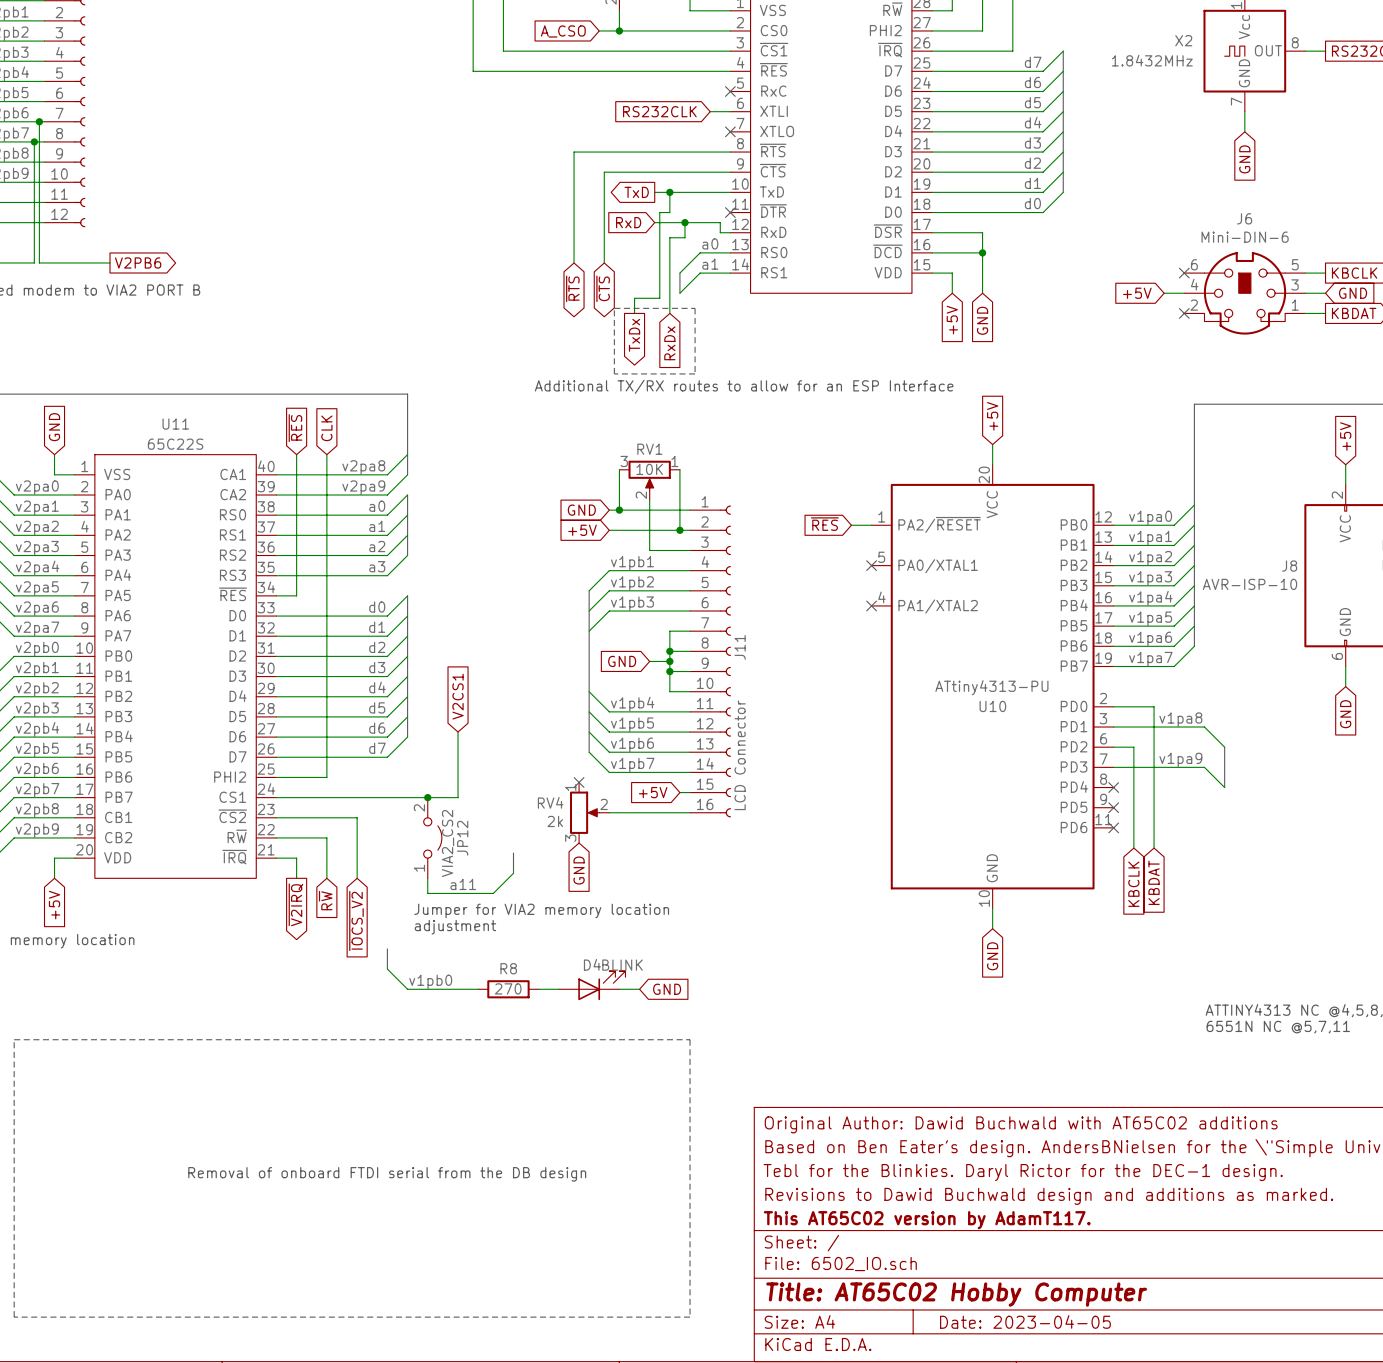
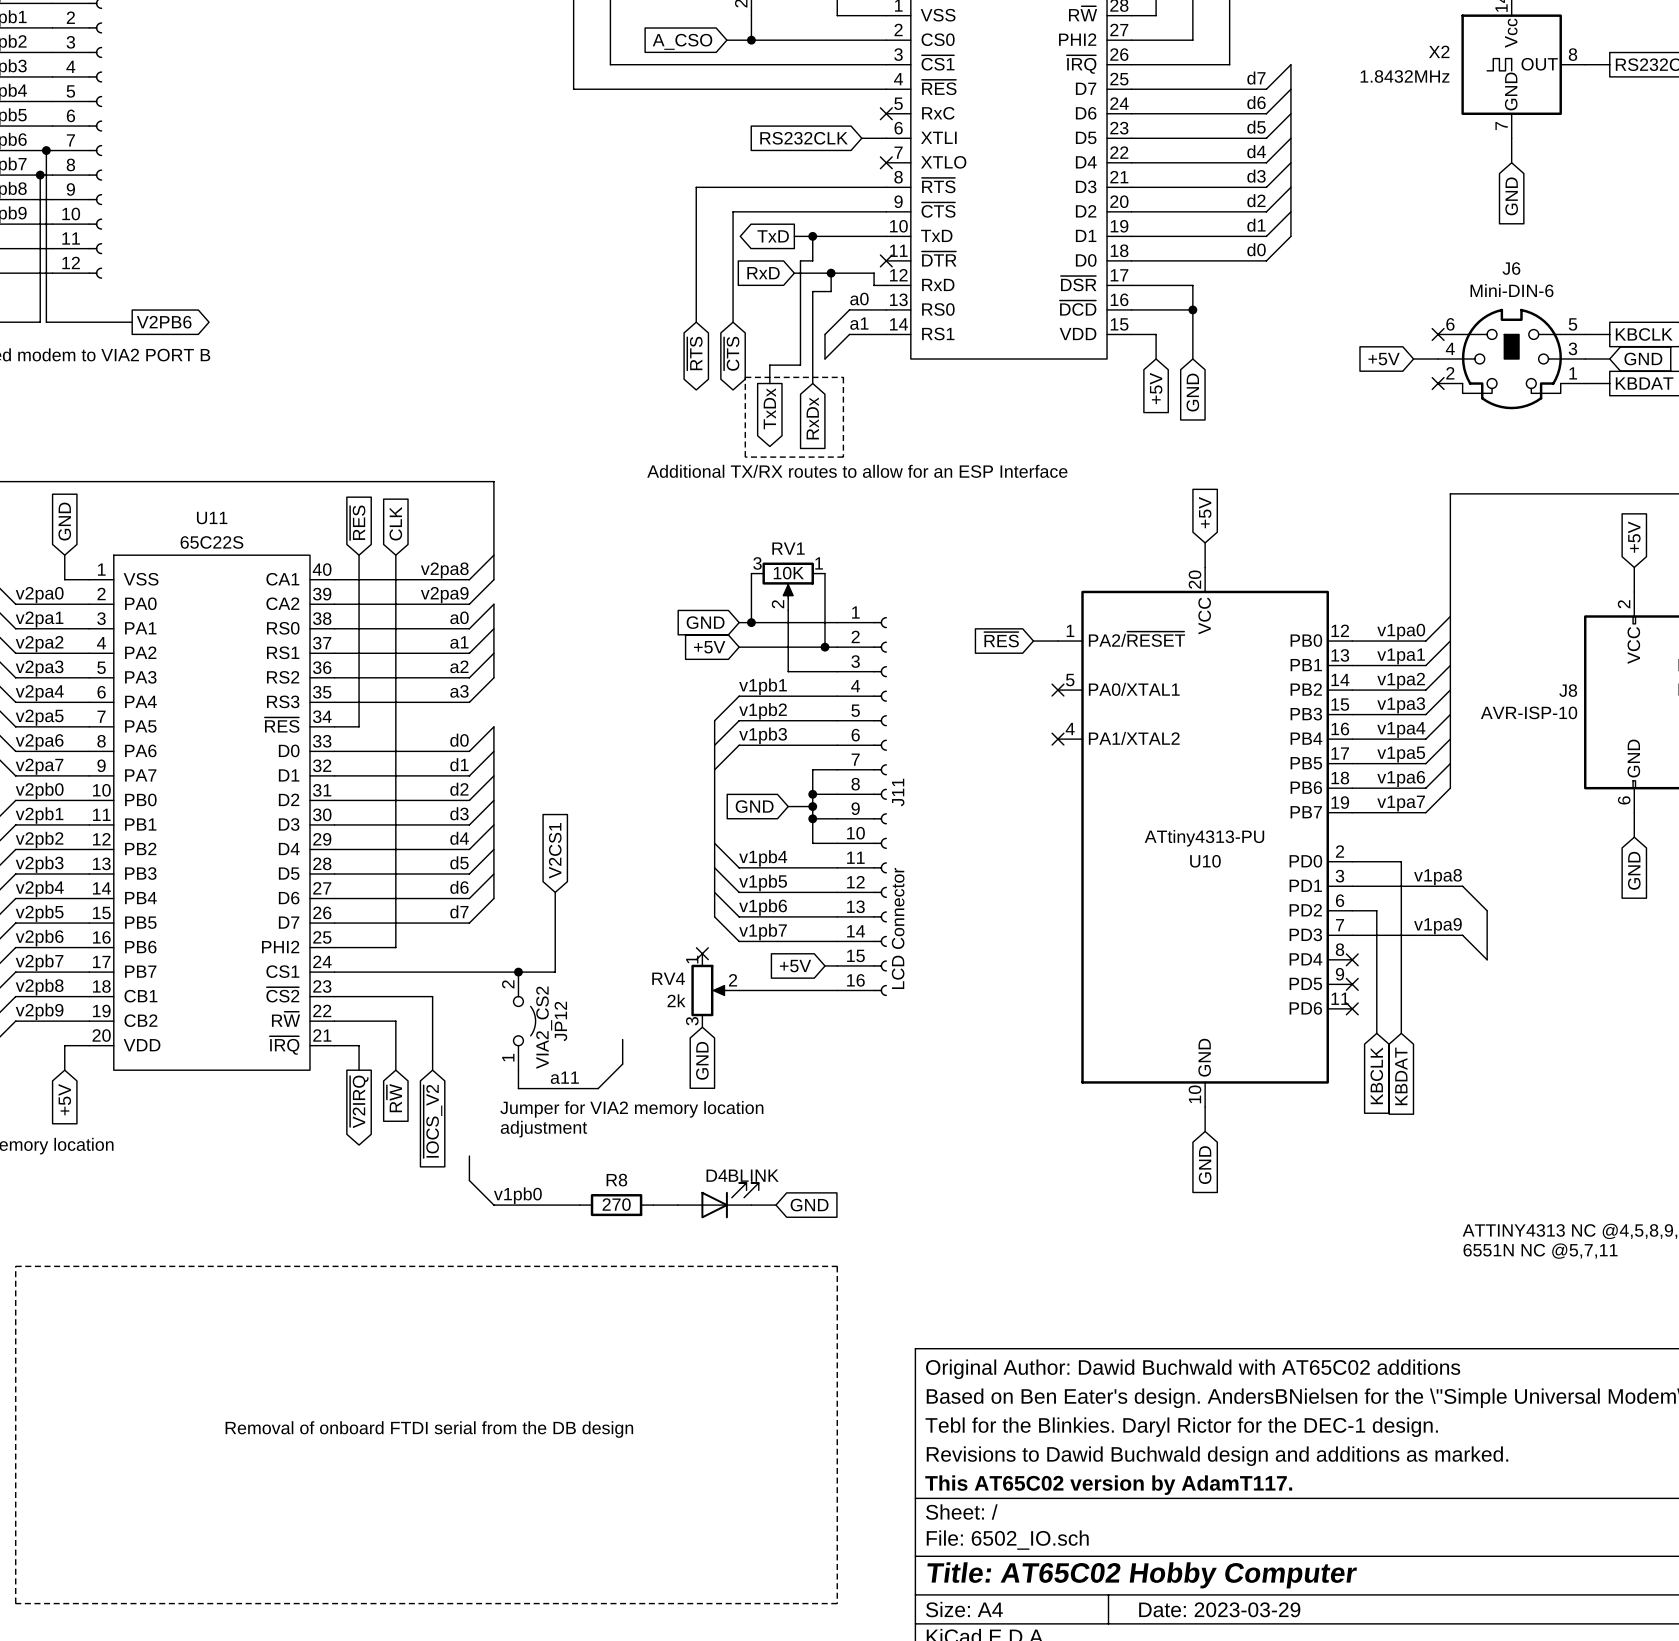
title block: Date: 2023-04-05 (1025, 1321) -> Date: 2023-03-29 (1219, 1609)

